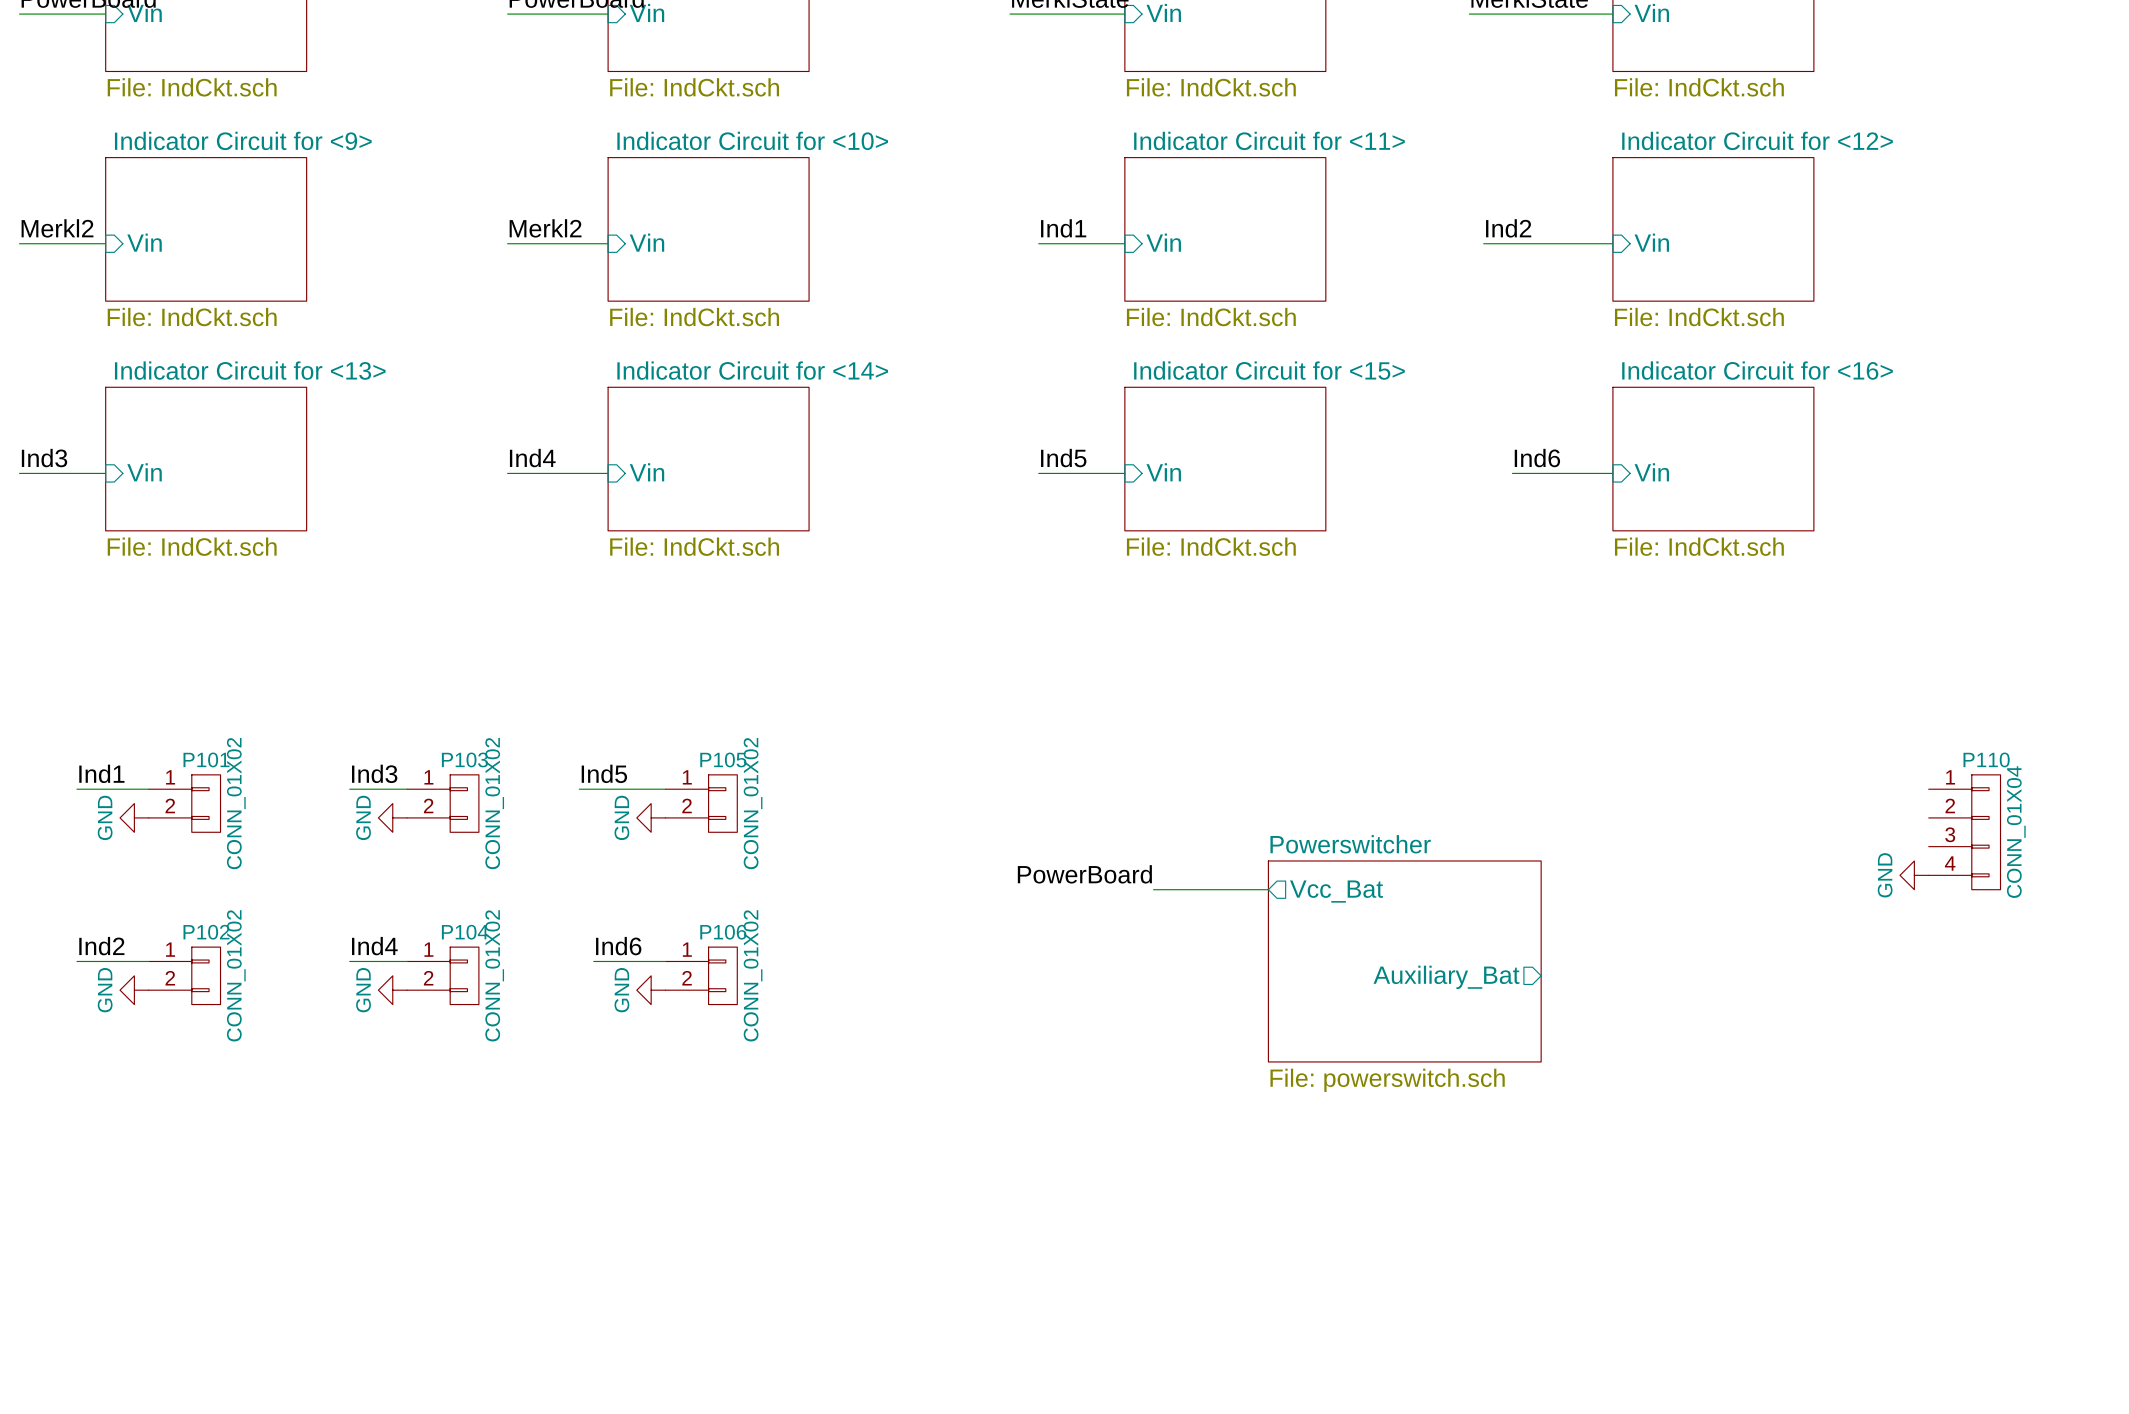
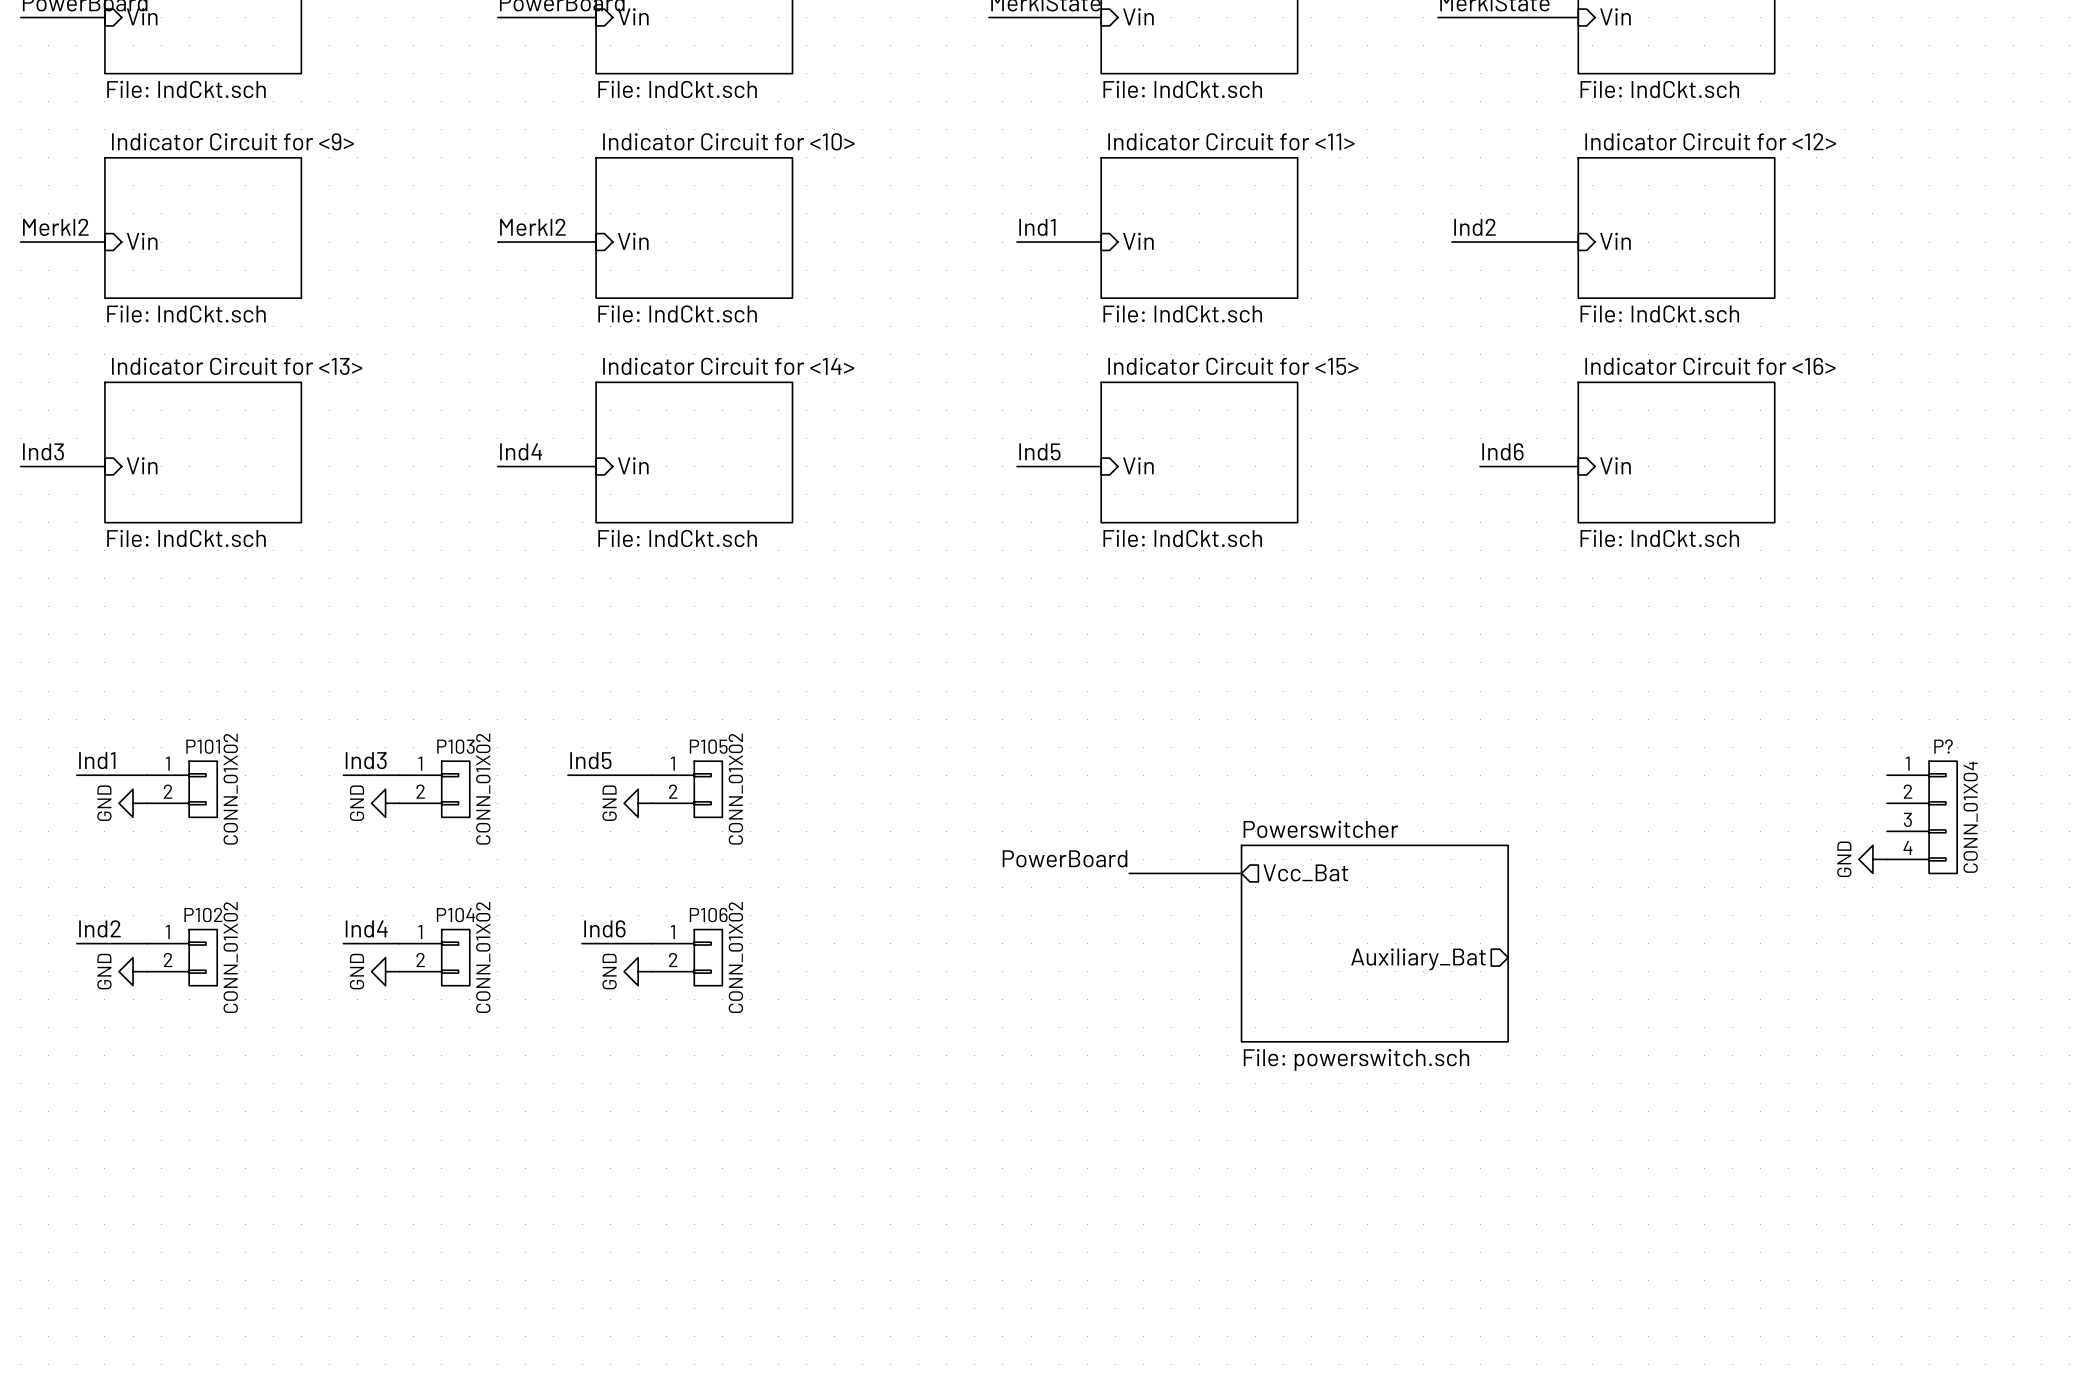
P110 name: P110 (1986, 759) -> P? (1943, 746)

